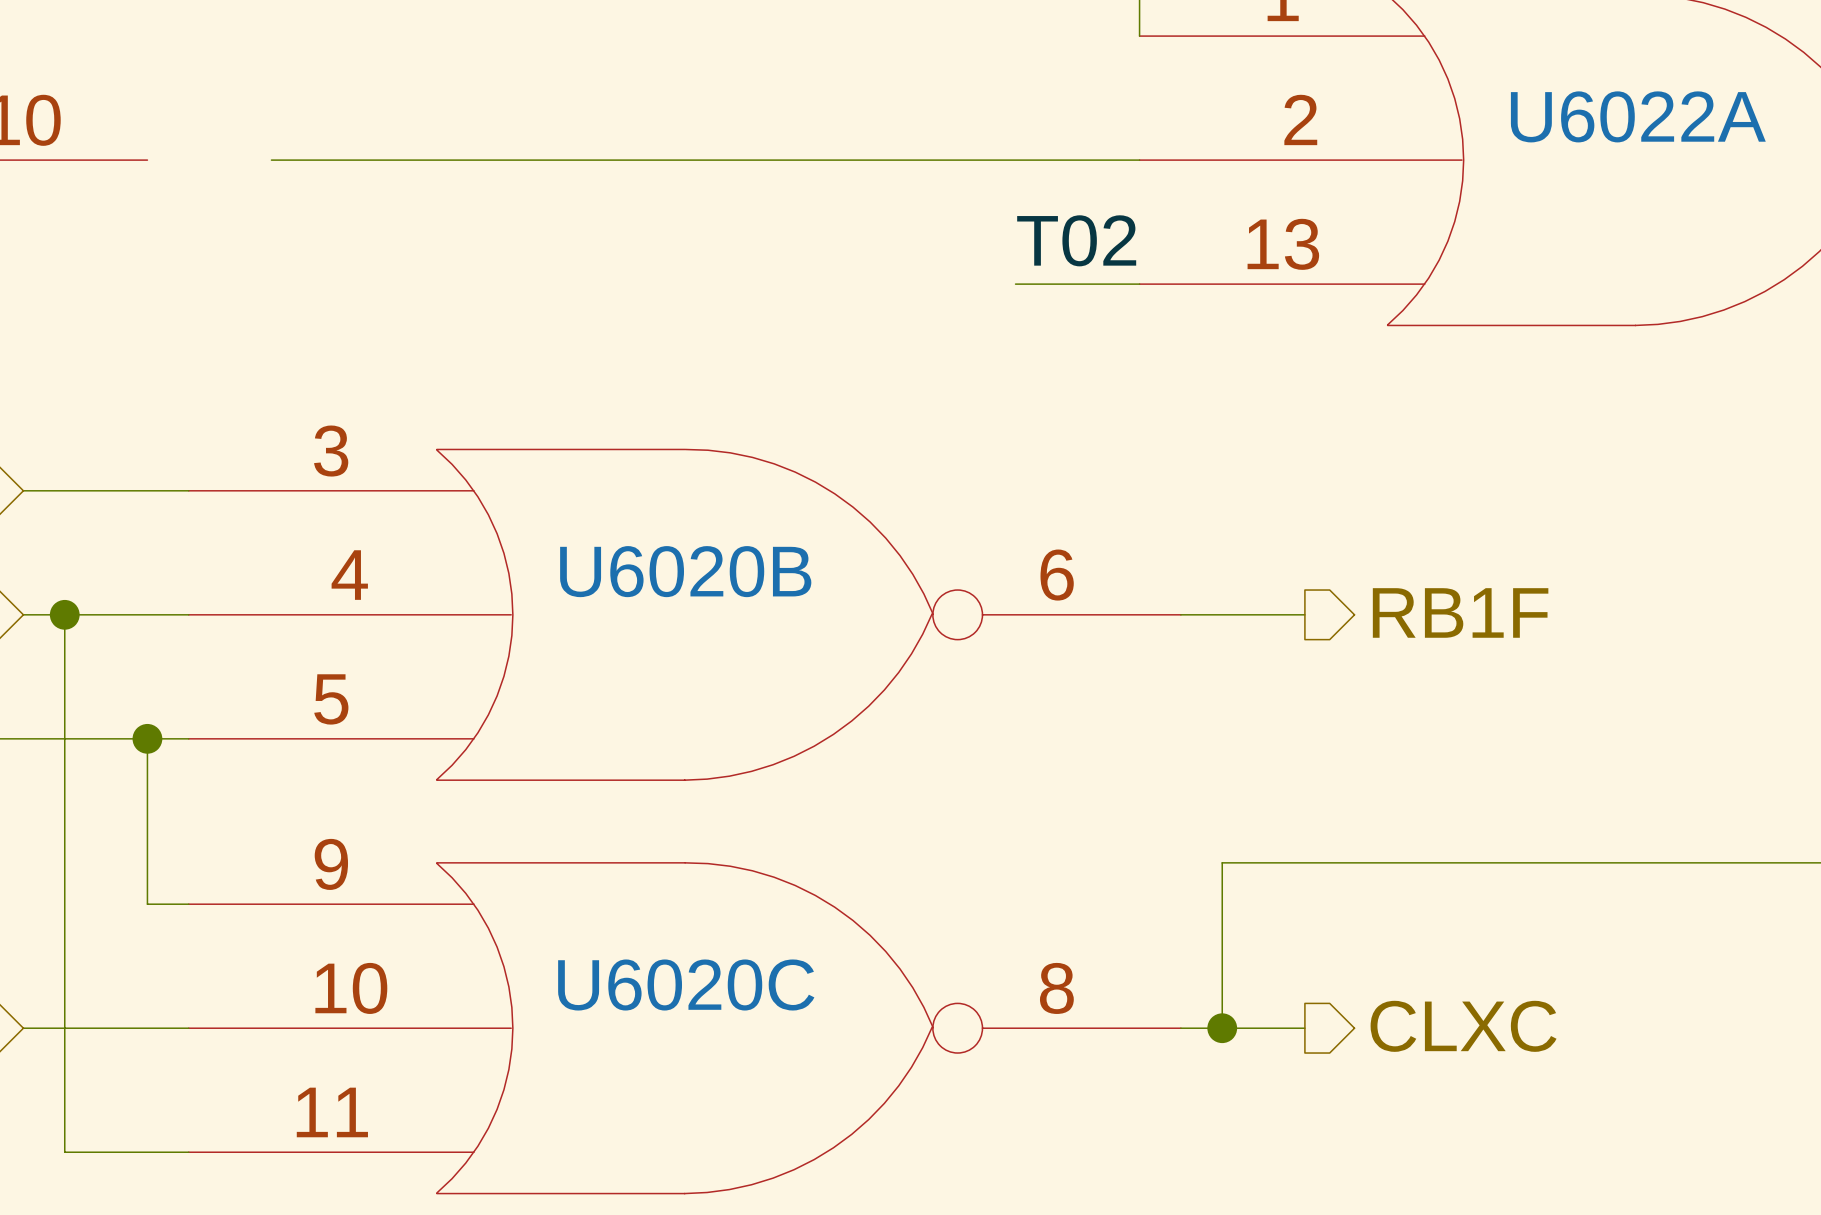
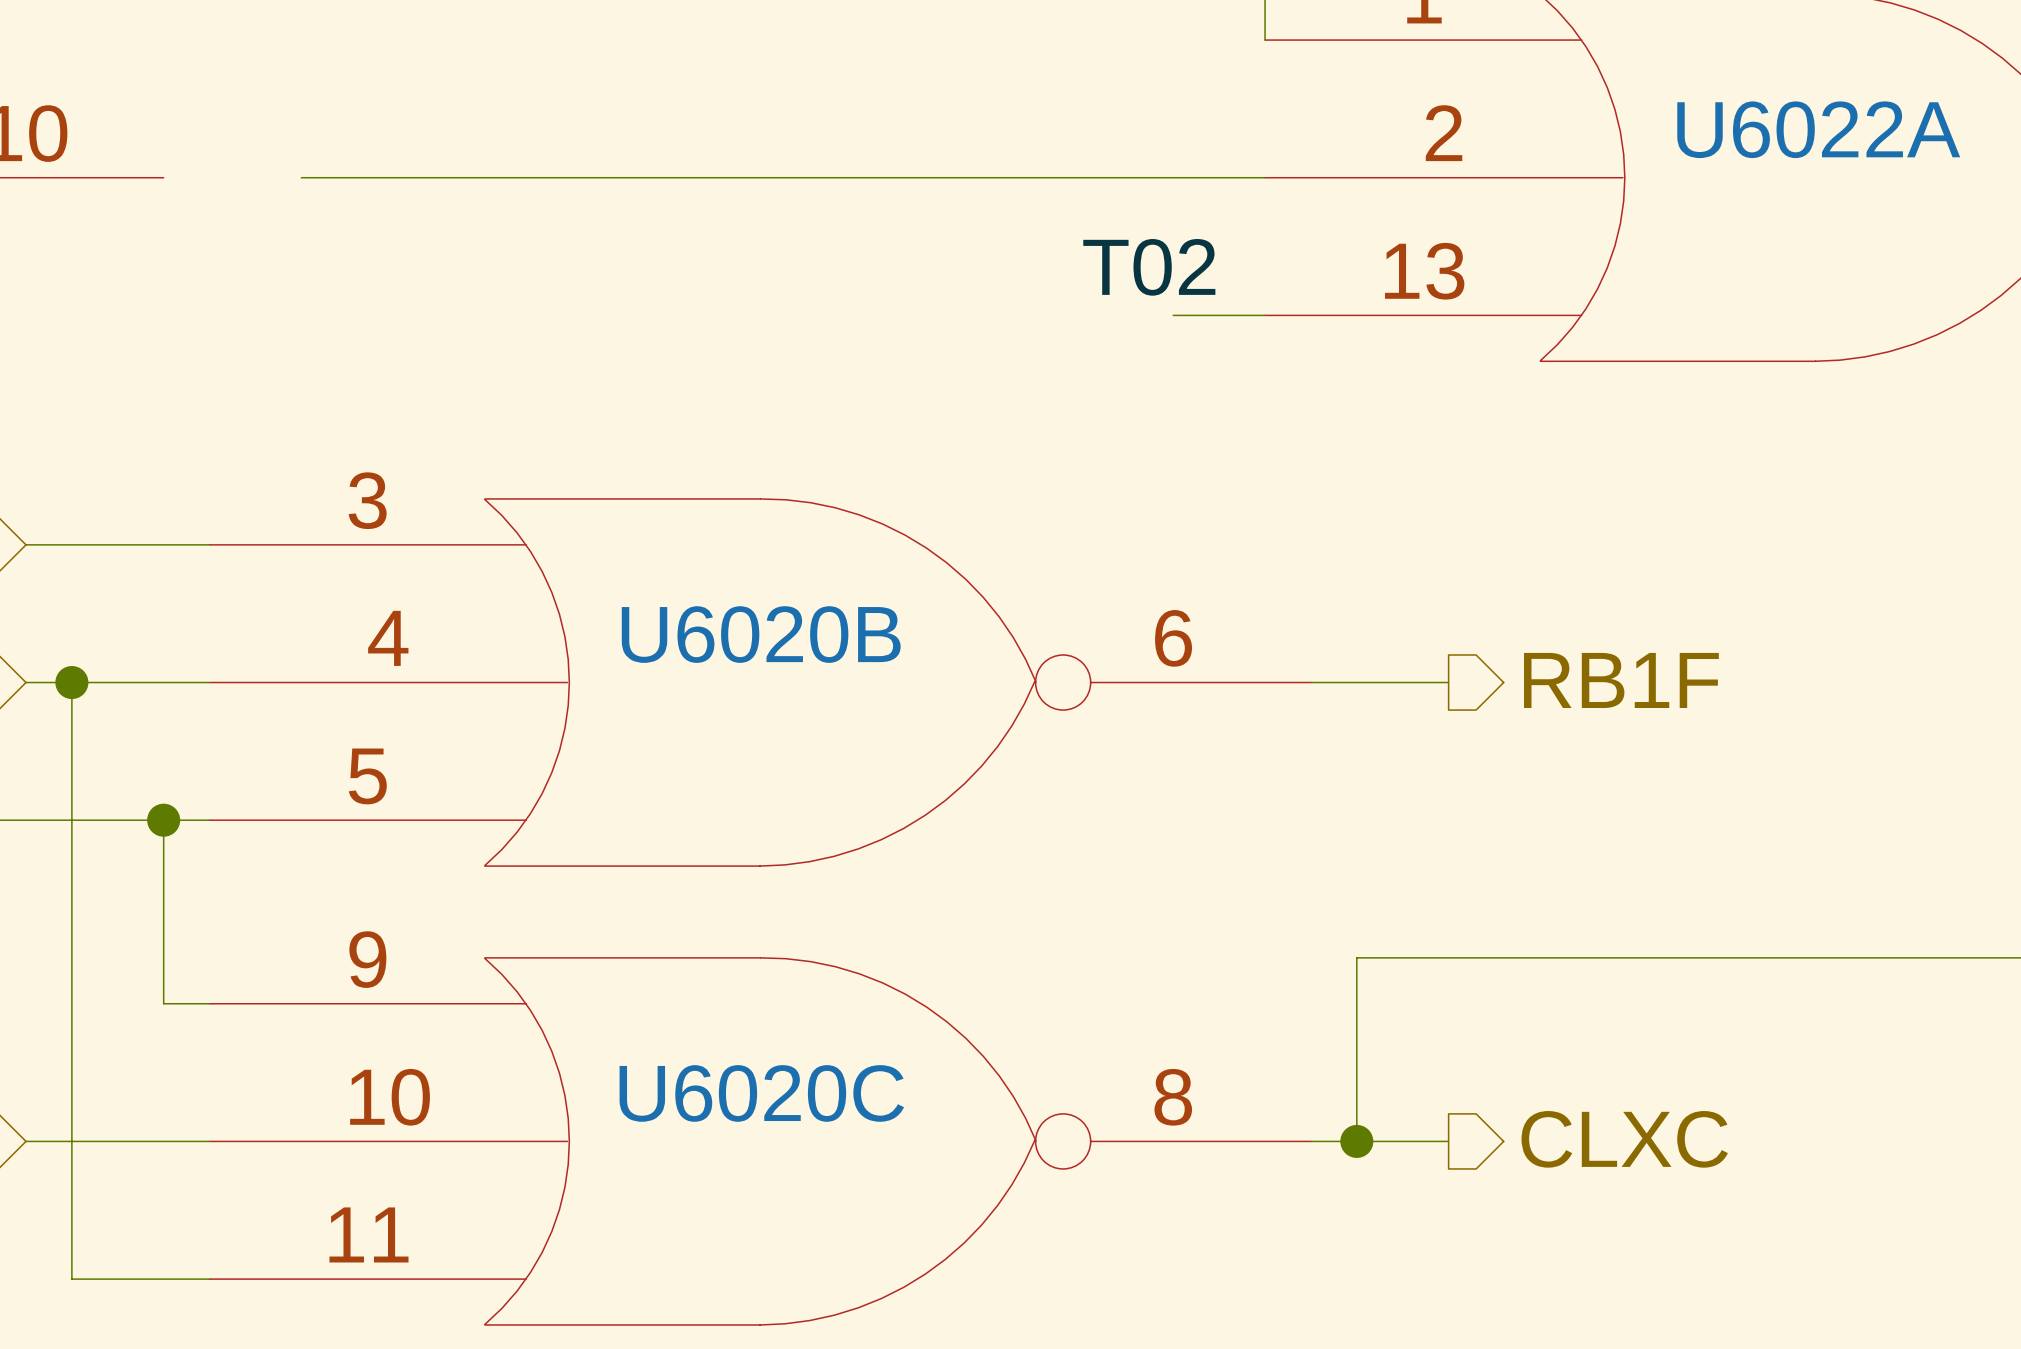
label position: T02 (1076, 240) -> T02 (1149, 267)
wire: (1015, 284) (1056, 284) -> none

